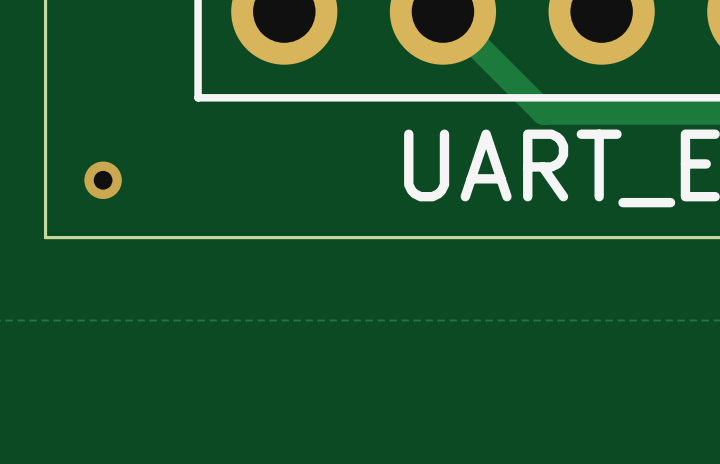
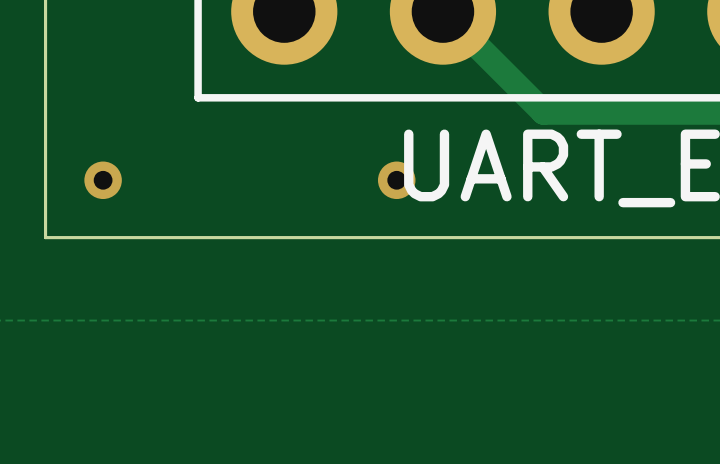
via: none -> (396, 180)

